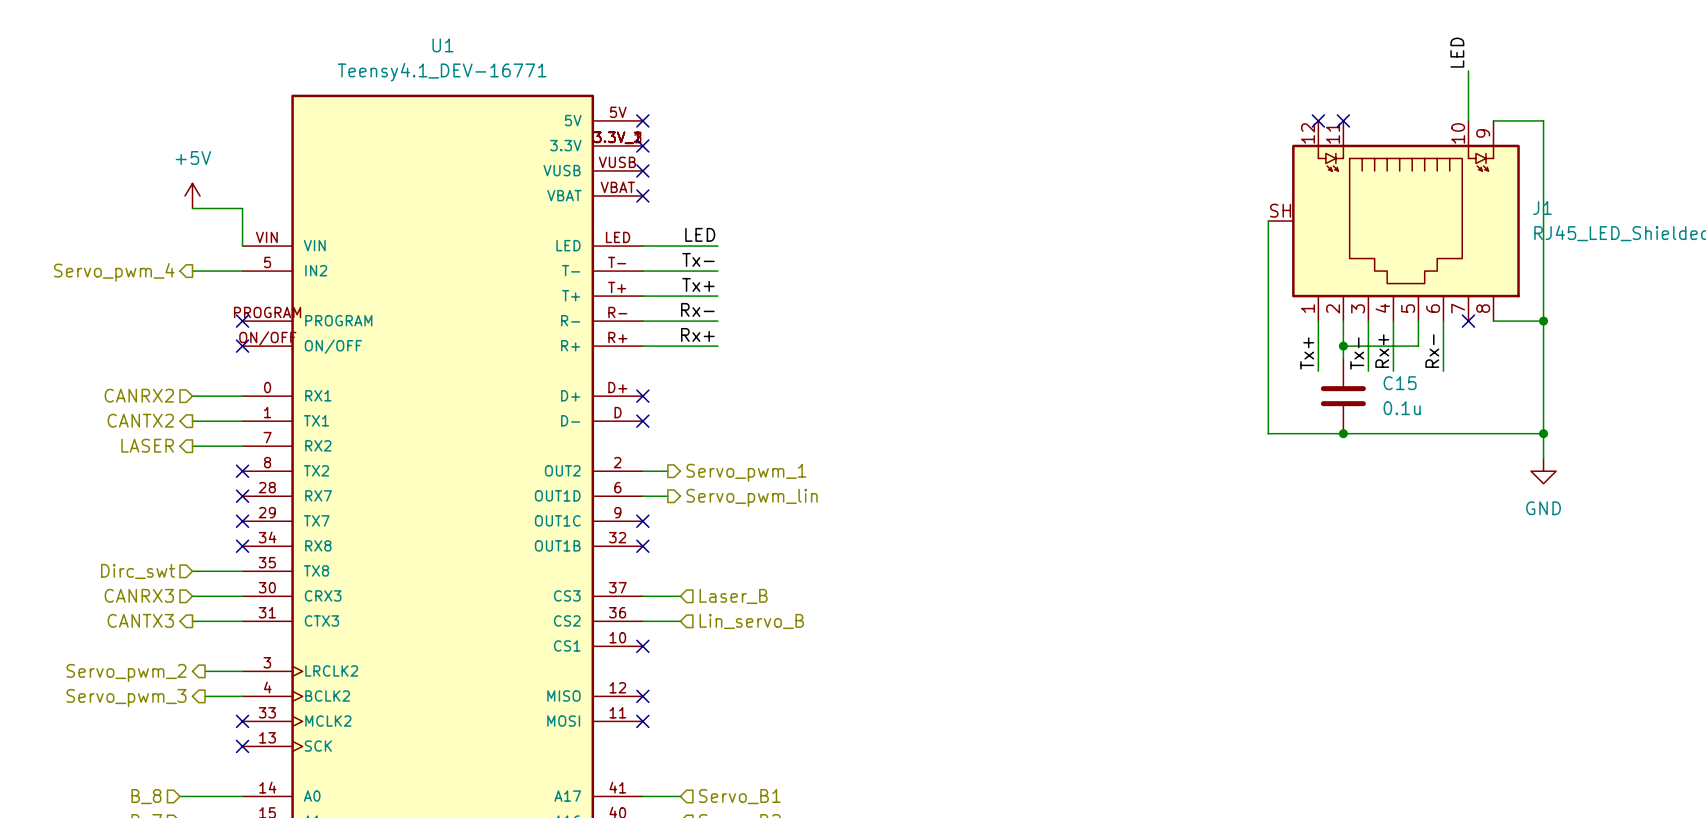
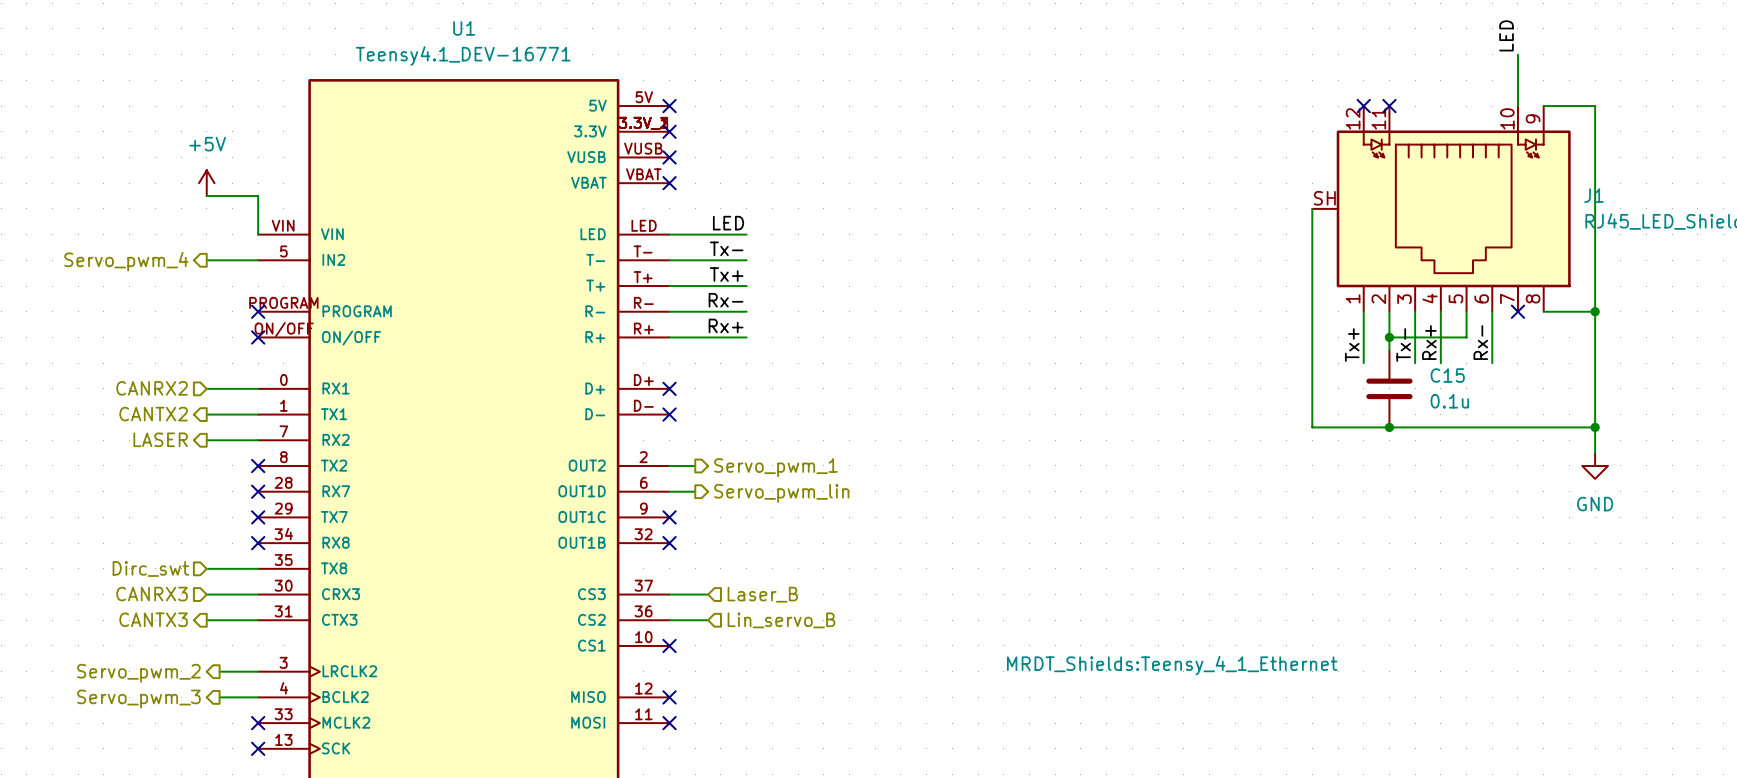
U1 pin number: D (618, 412) -> D- (643, 405)
U1 text: none -> MRDT_Shields:Teensy_4_1_Ethernet (1172, 665)

